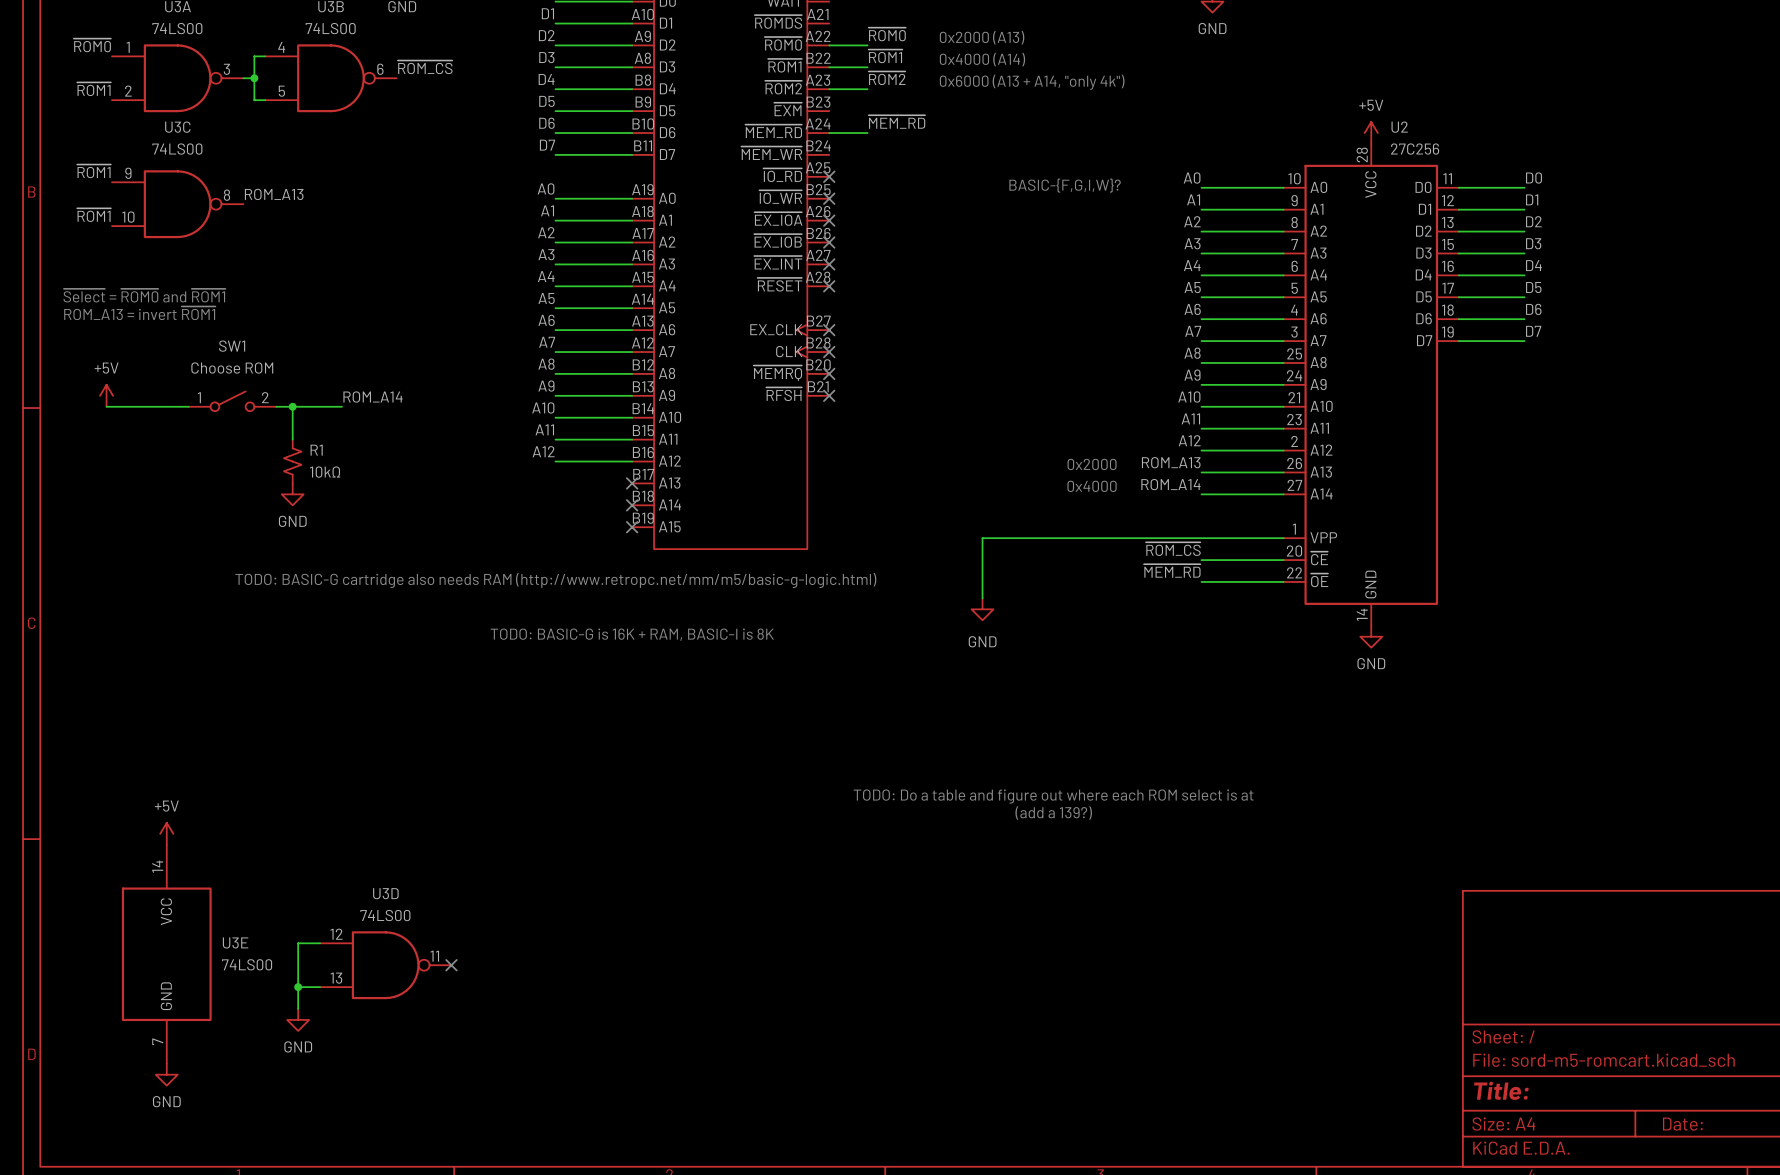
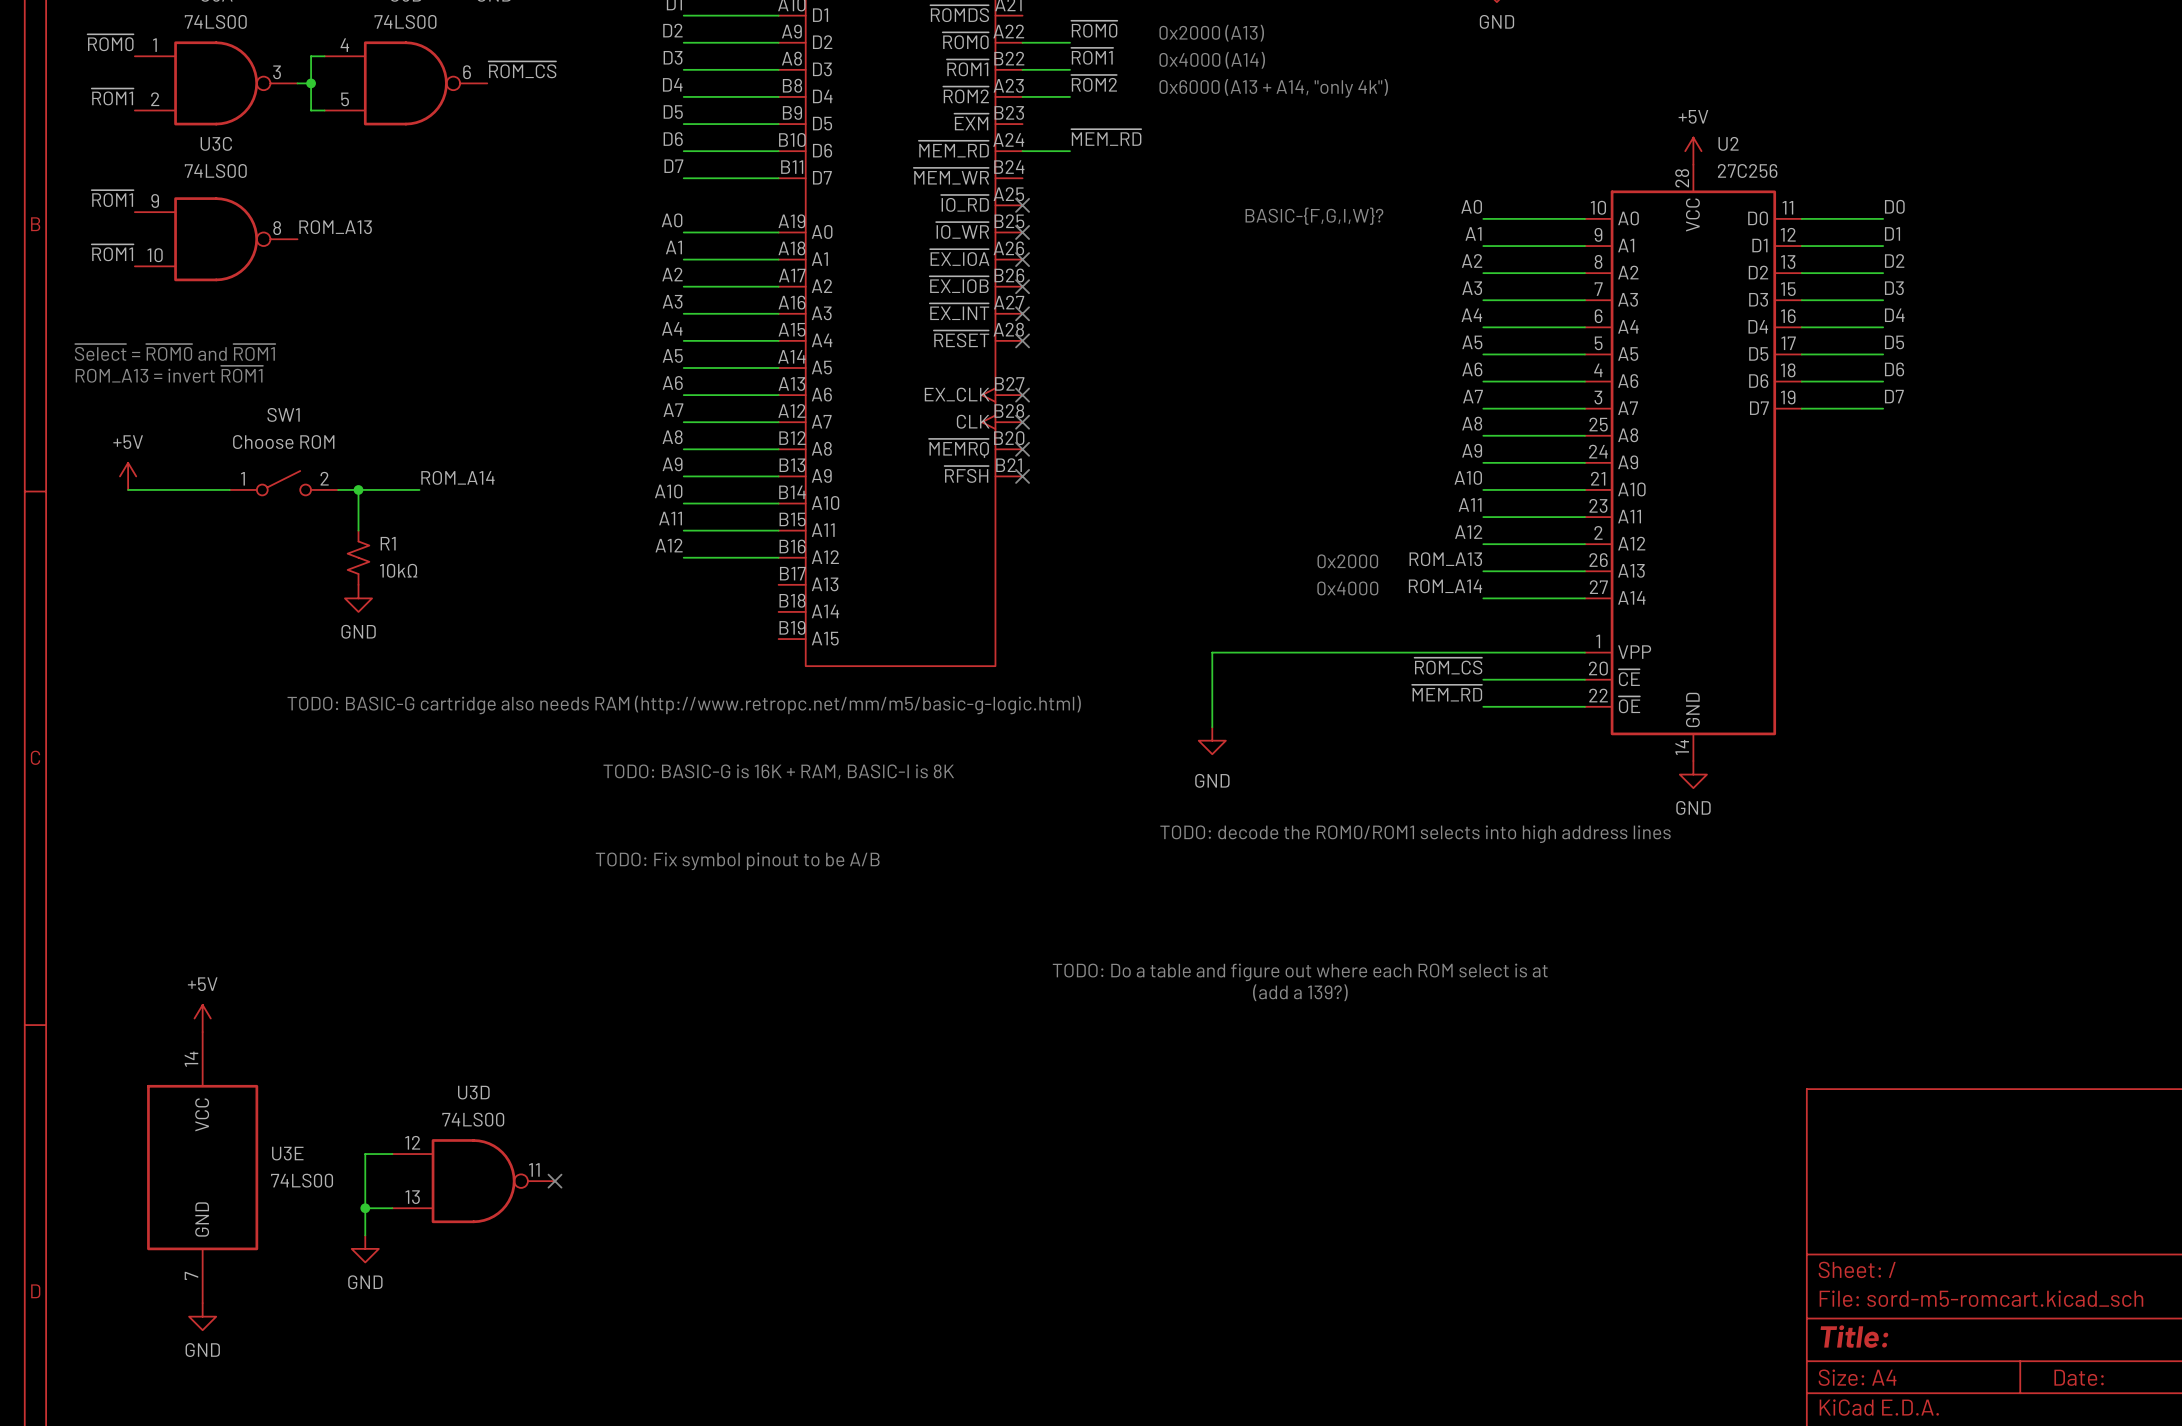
no-connect mark: (632, 483) -> none
no-connect mark: (632, 505) -> none
no-connect mark: (632, 527) -> none
text: none -> TODO: decode the ROM0/ROM1 selects into high address lines (1415, 834)
text: none -> TODO: Fix symbol pinout to be A/B (737, 861)

